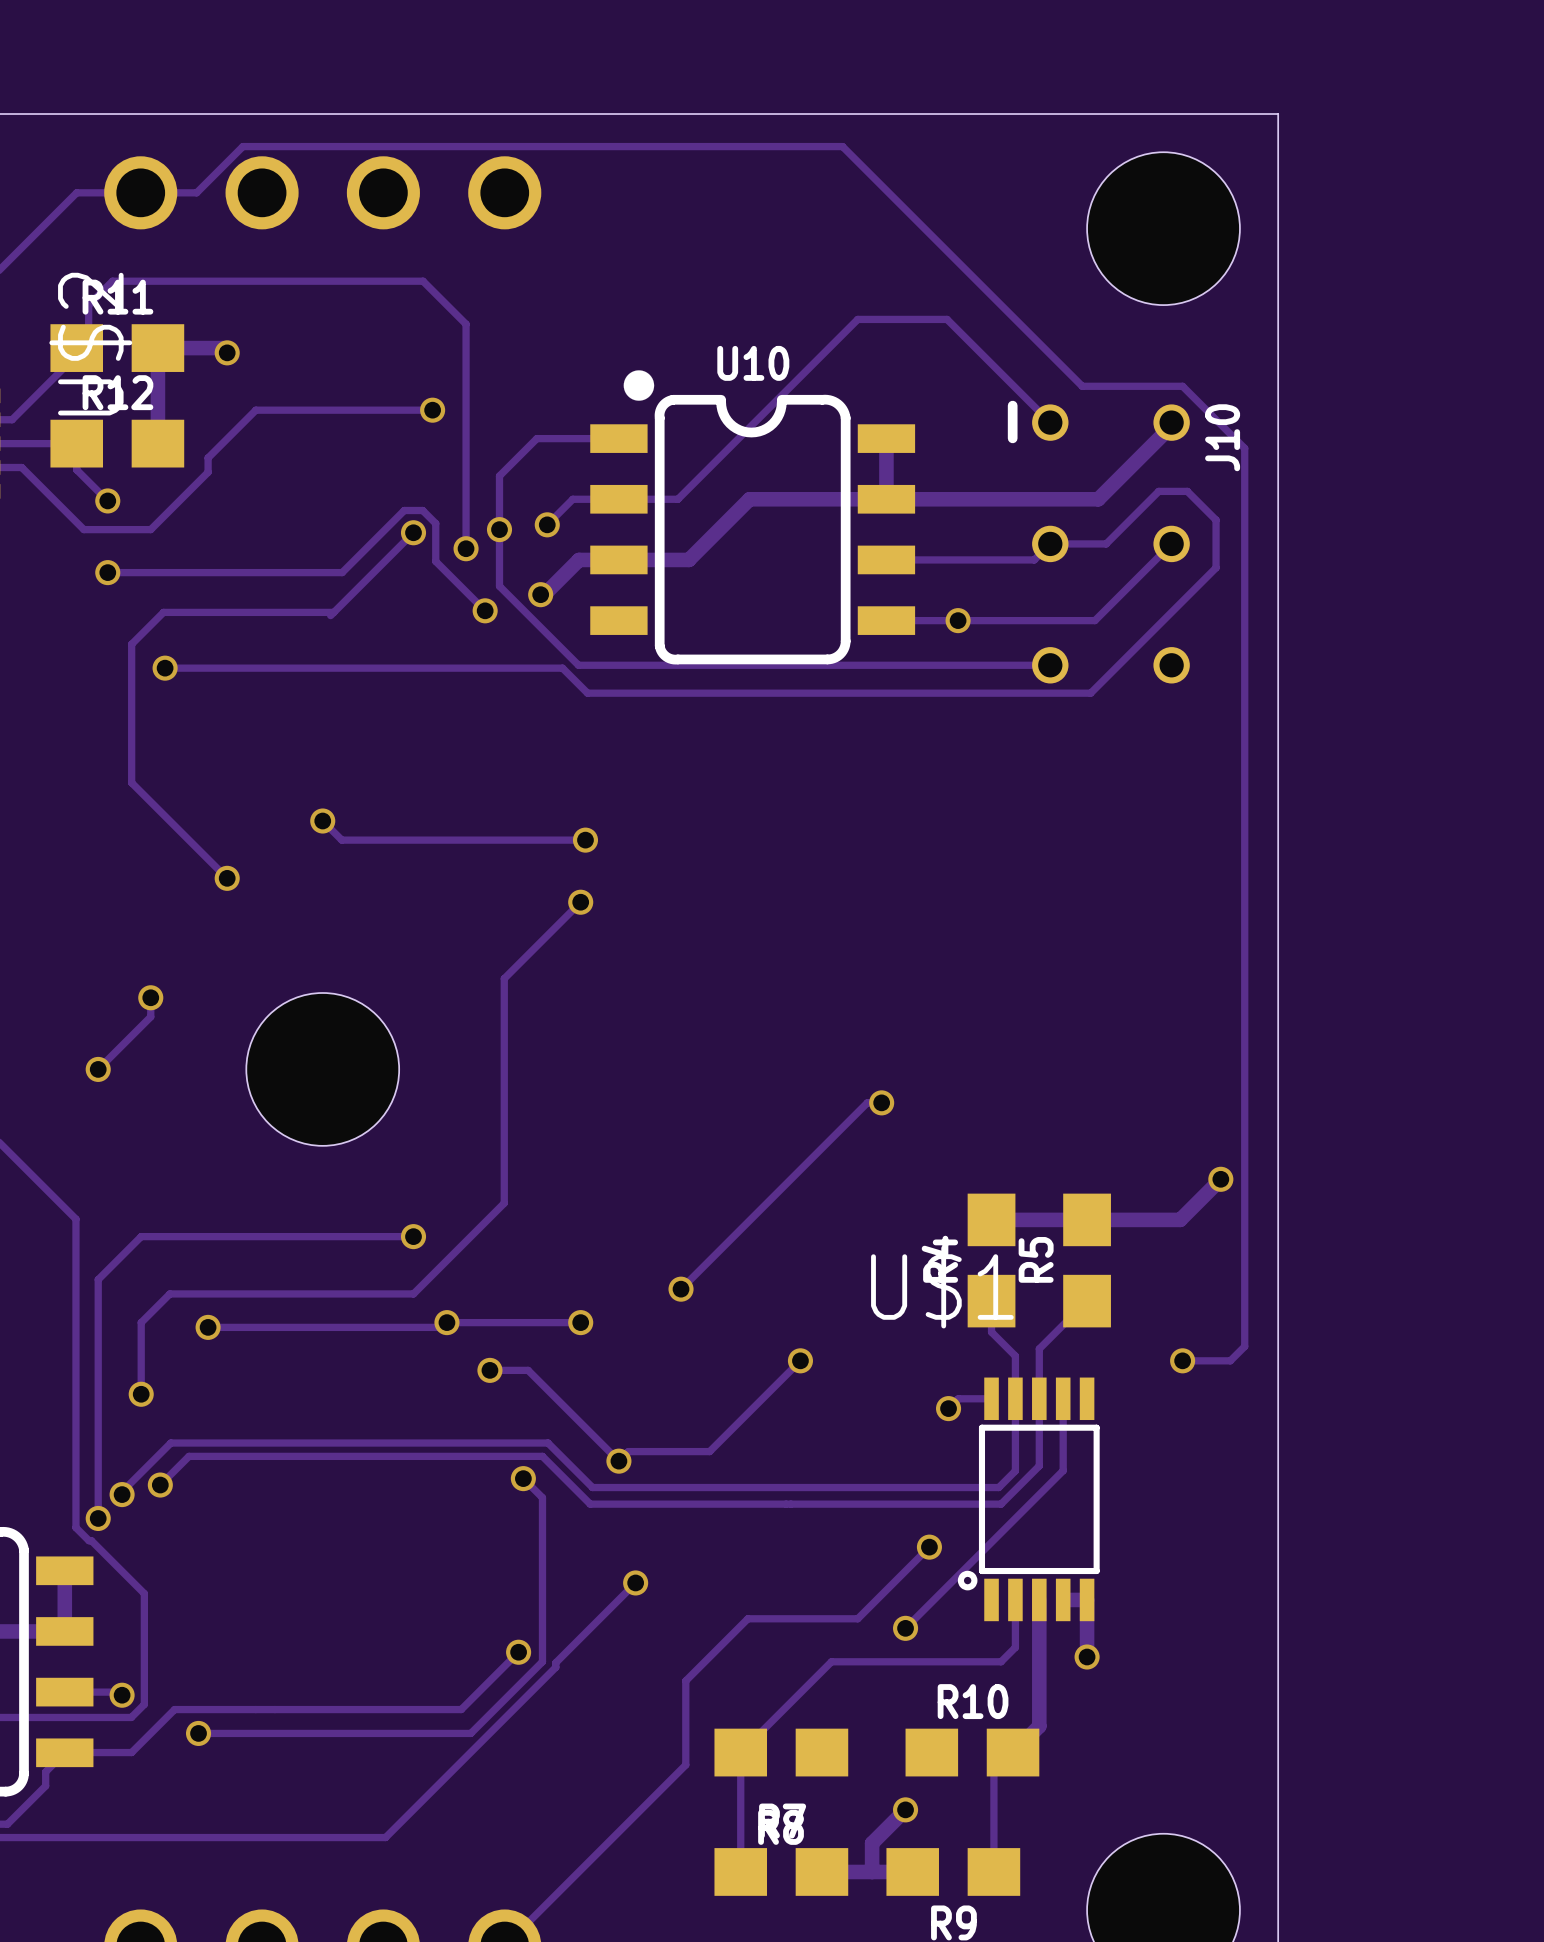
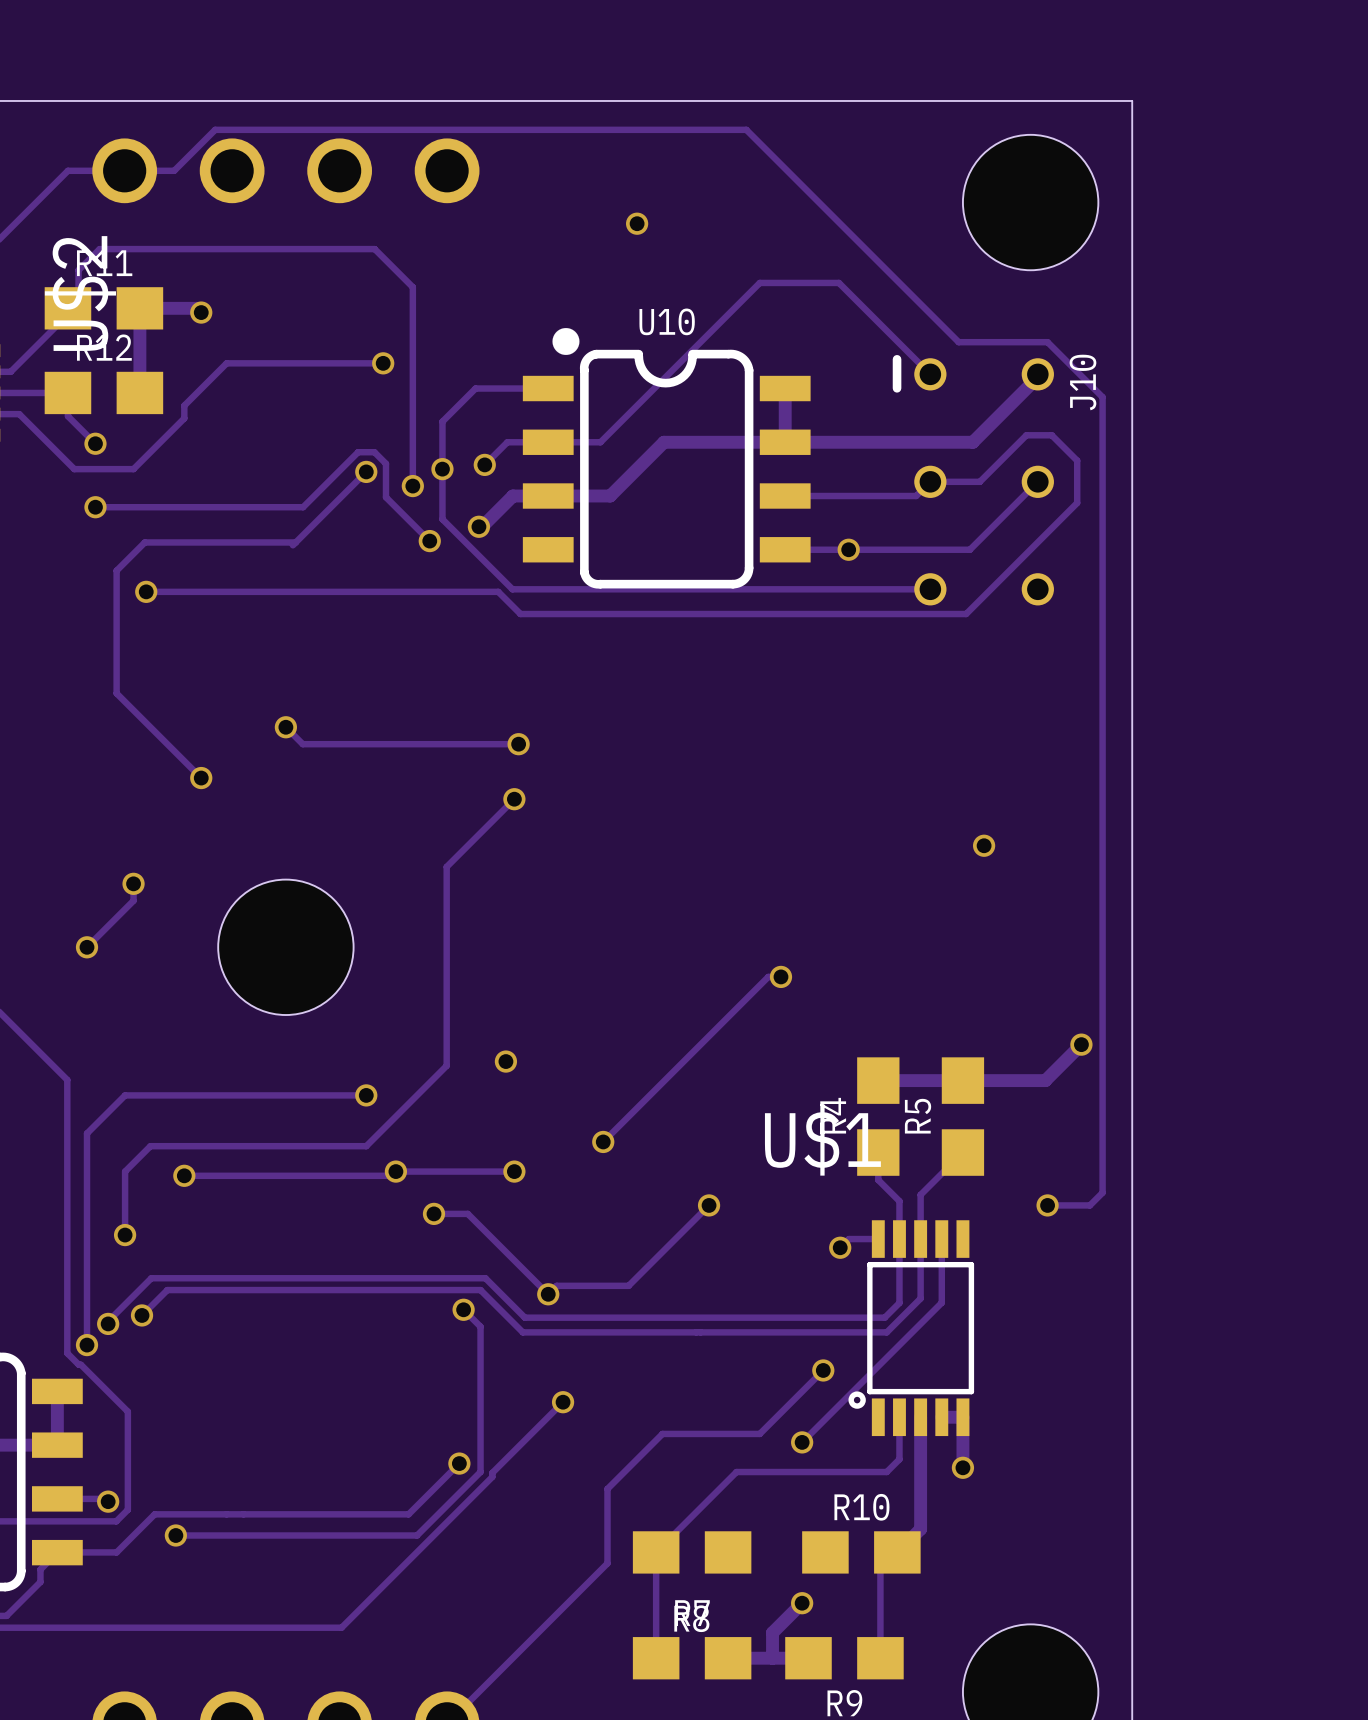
via: none -> (637, 223)
via: none -> (984, 845)
via: none -> (505, 1061)

